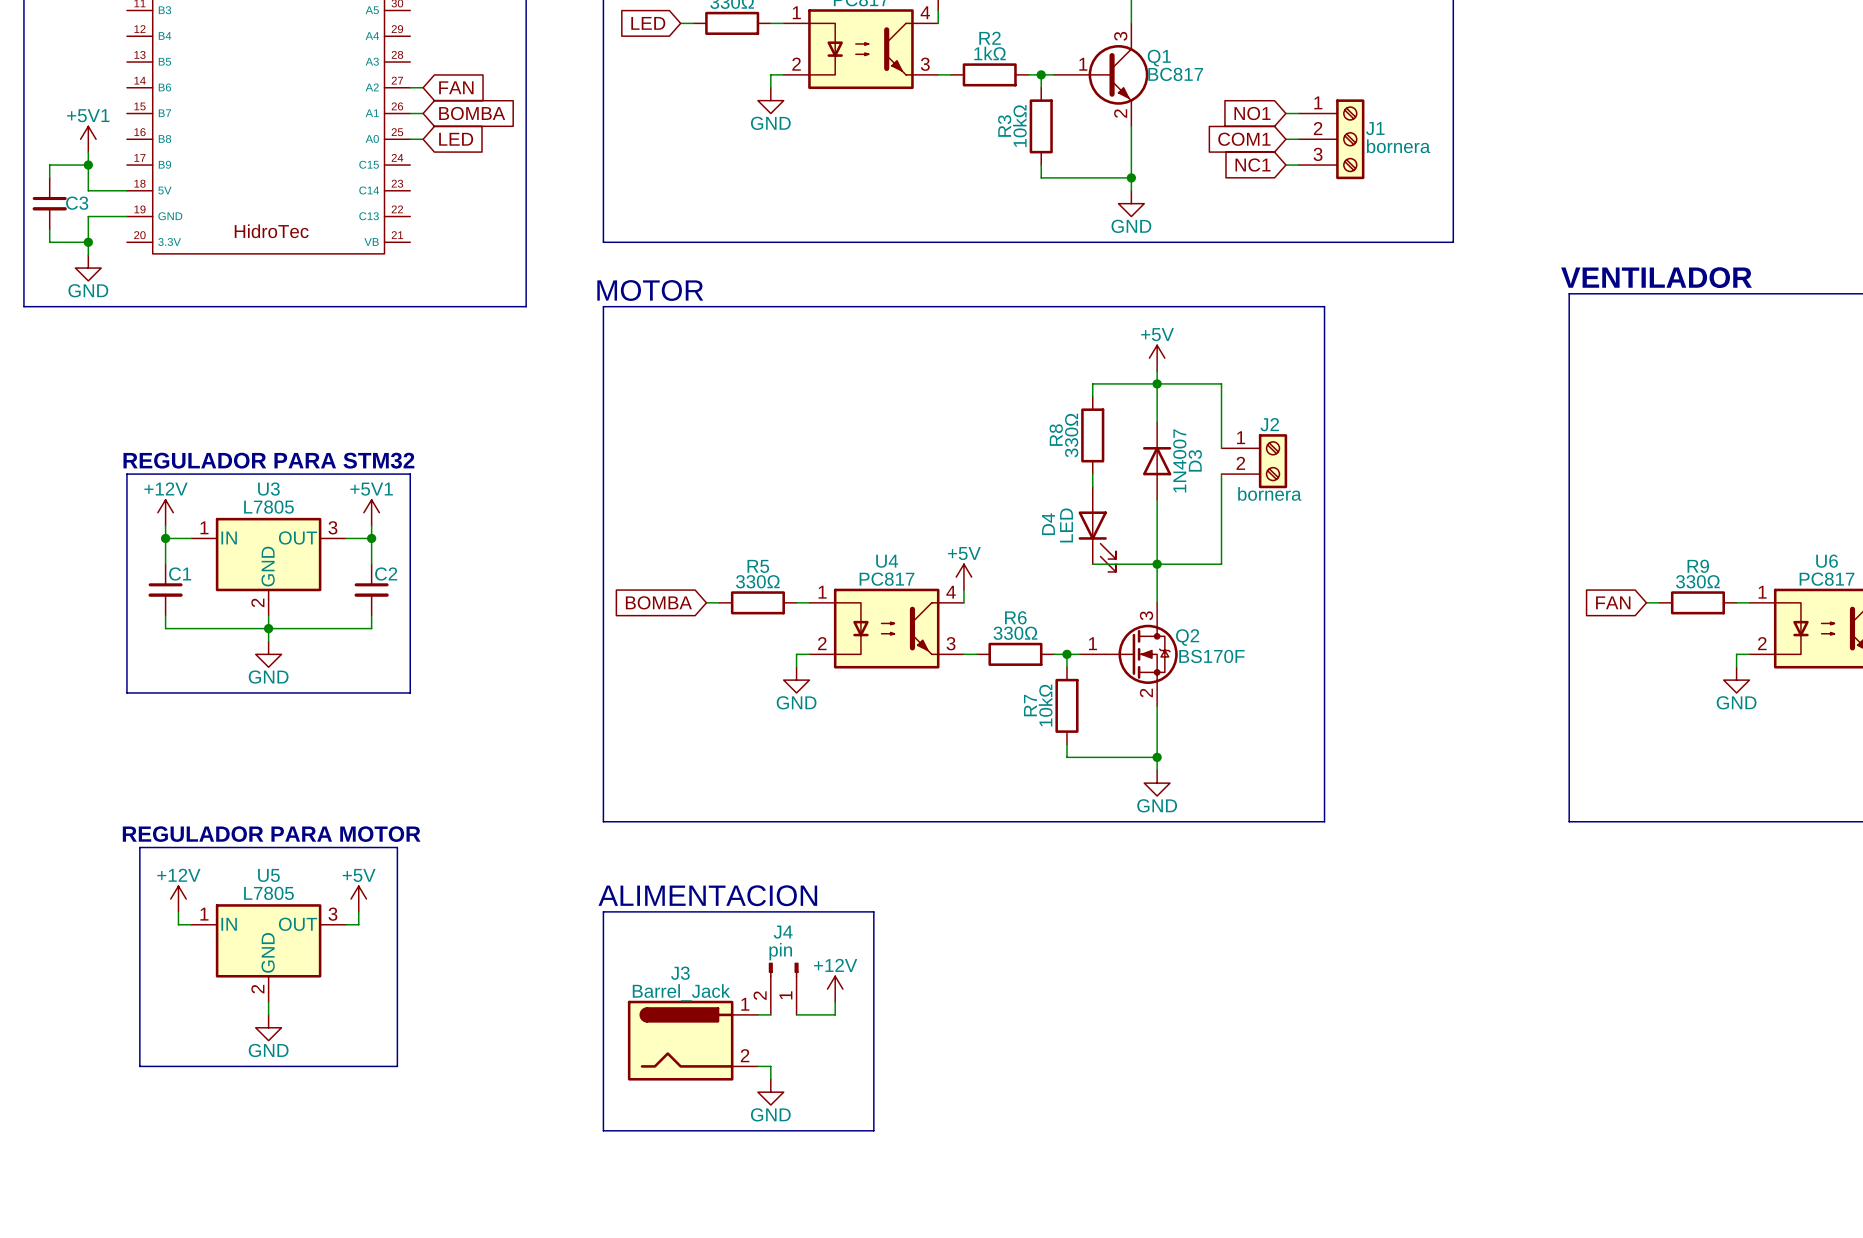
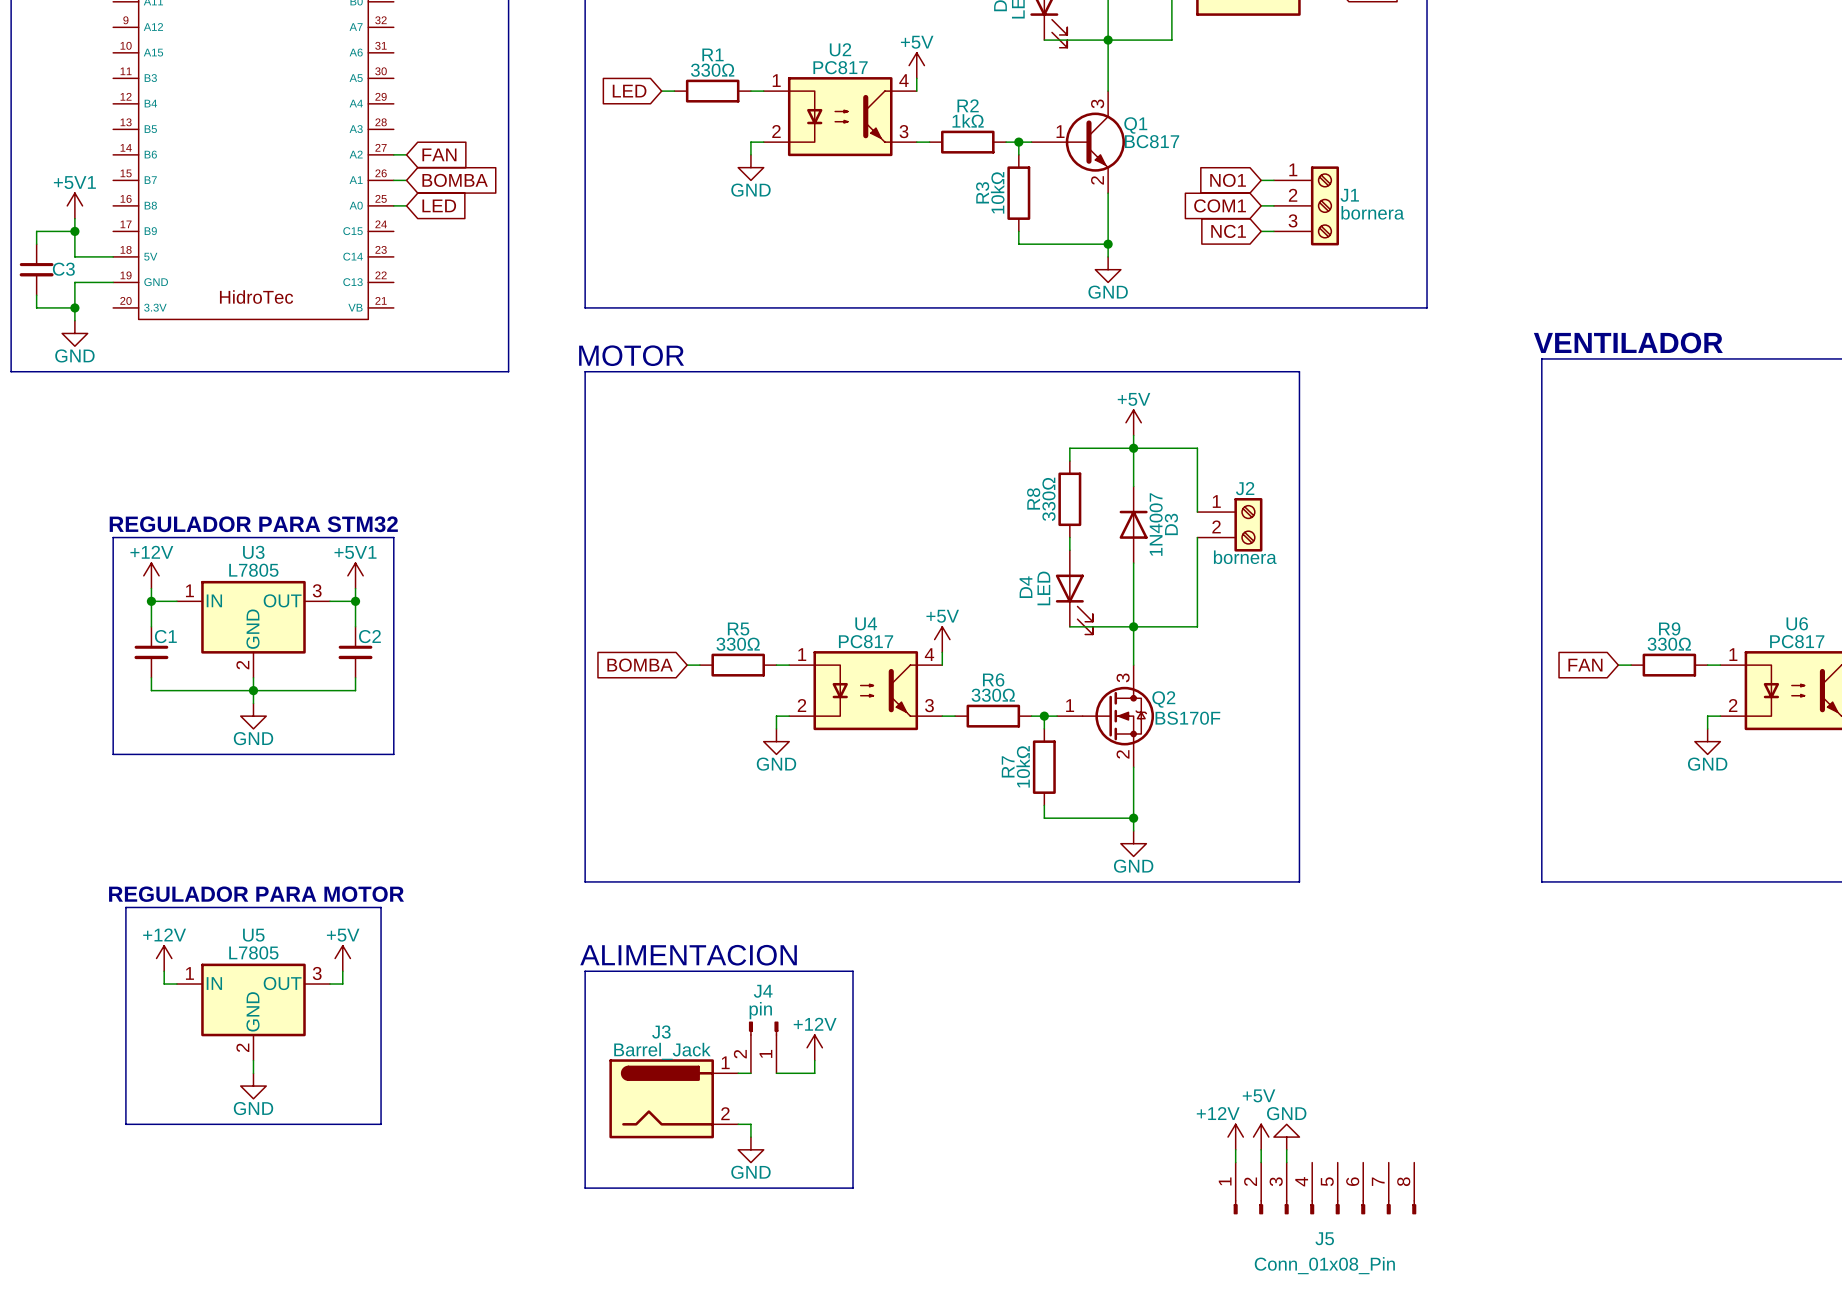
power symbol: none -> +12V (1235, 1137)
power symbol: none -> +5V (1261, 1137)
power symbol: none -> GND (1286, 1137)
wire: none -> (1235, 1149) (1235, 1162)
wire: none -> (1261, 1149) (1261, 1162)
wire: none -> (1286, 1149) (1286, 1162)
J5: none -> Conn_01x08_Pin (1324, 1188)

